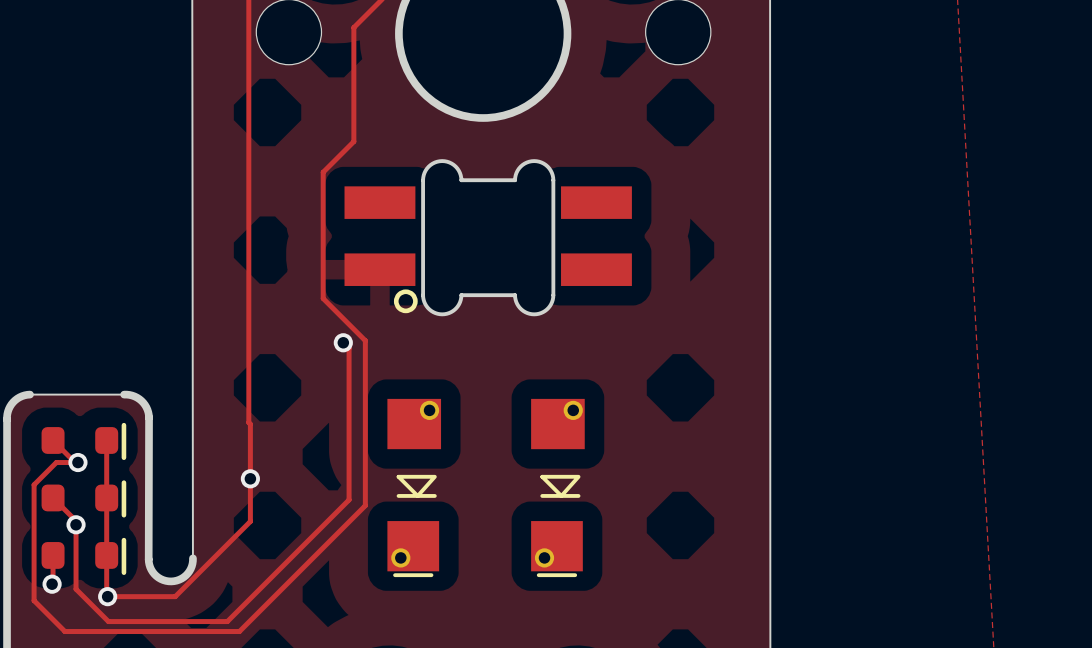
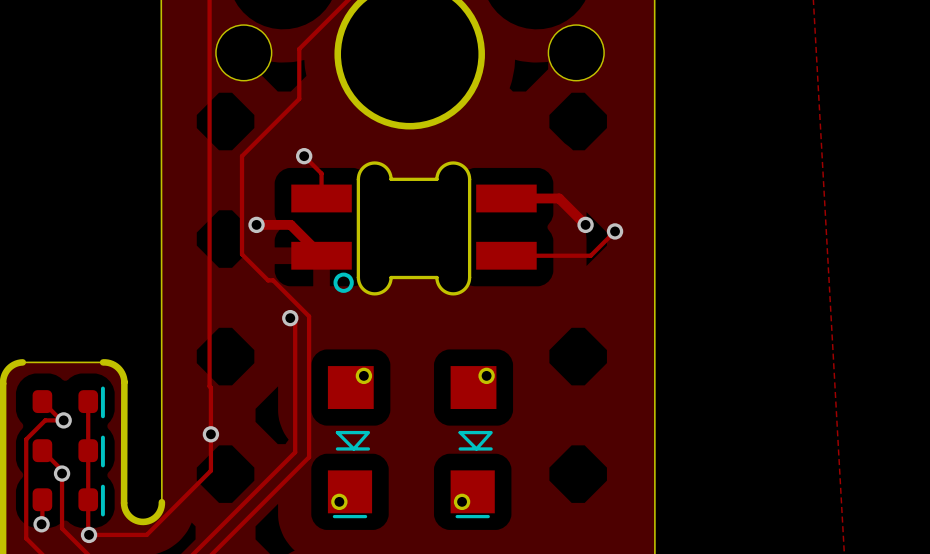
track: (353, 86) (353, 141) (323, 172) (323, 298) -> (299, 98) (242, 156) (242, 254) (268, 280) (273, 280)
track: none -> (304, 156) (321, 173) (321, 198)
via: none -> (304, 156)
track: none -> (506, 198) (559, 198) (585, 224)
track: none -> (256, 224) (290, 224) (321, 255)
via: none -> (256, 224)
via: none -> (585, 224)
track: none -> (615, 231) (590, 255) (506, 255)
via: none -> (615, 231)

